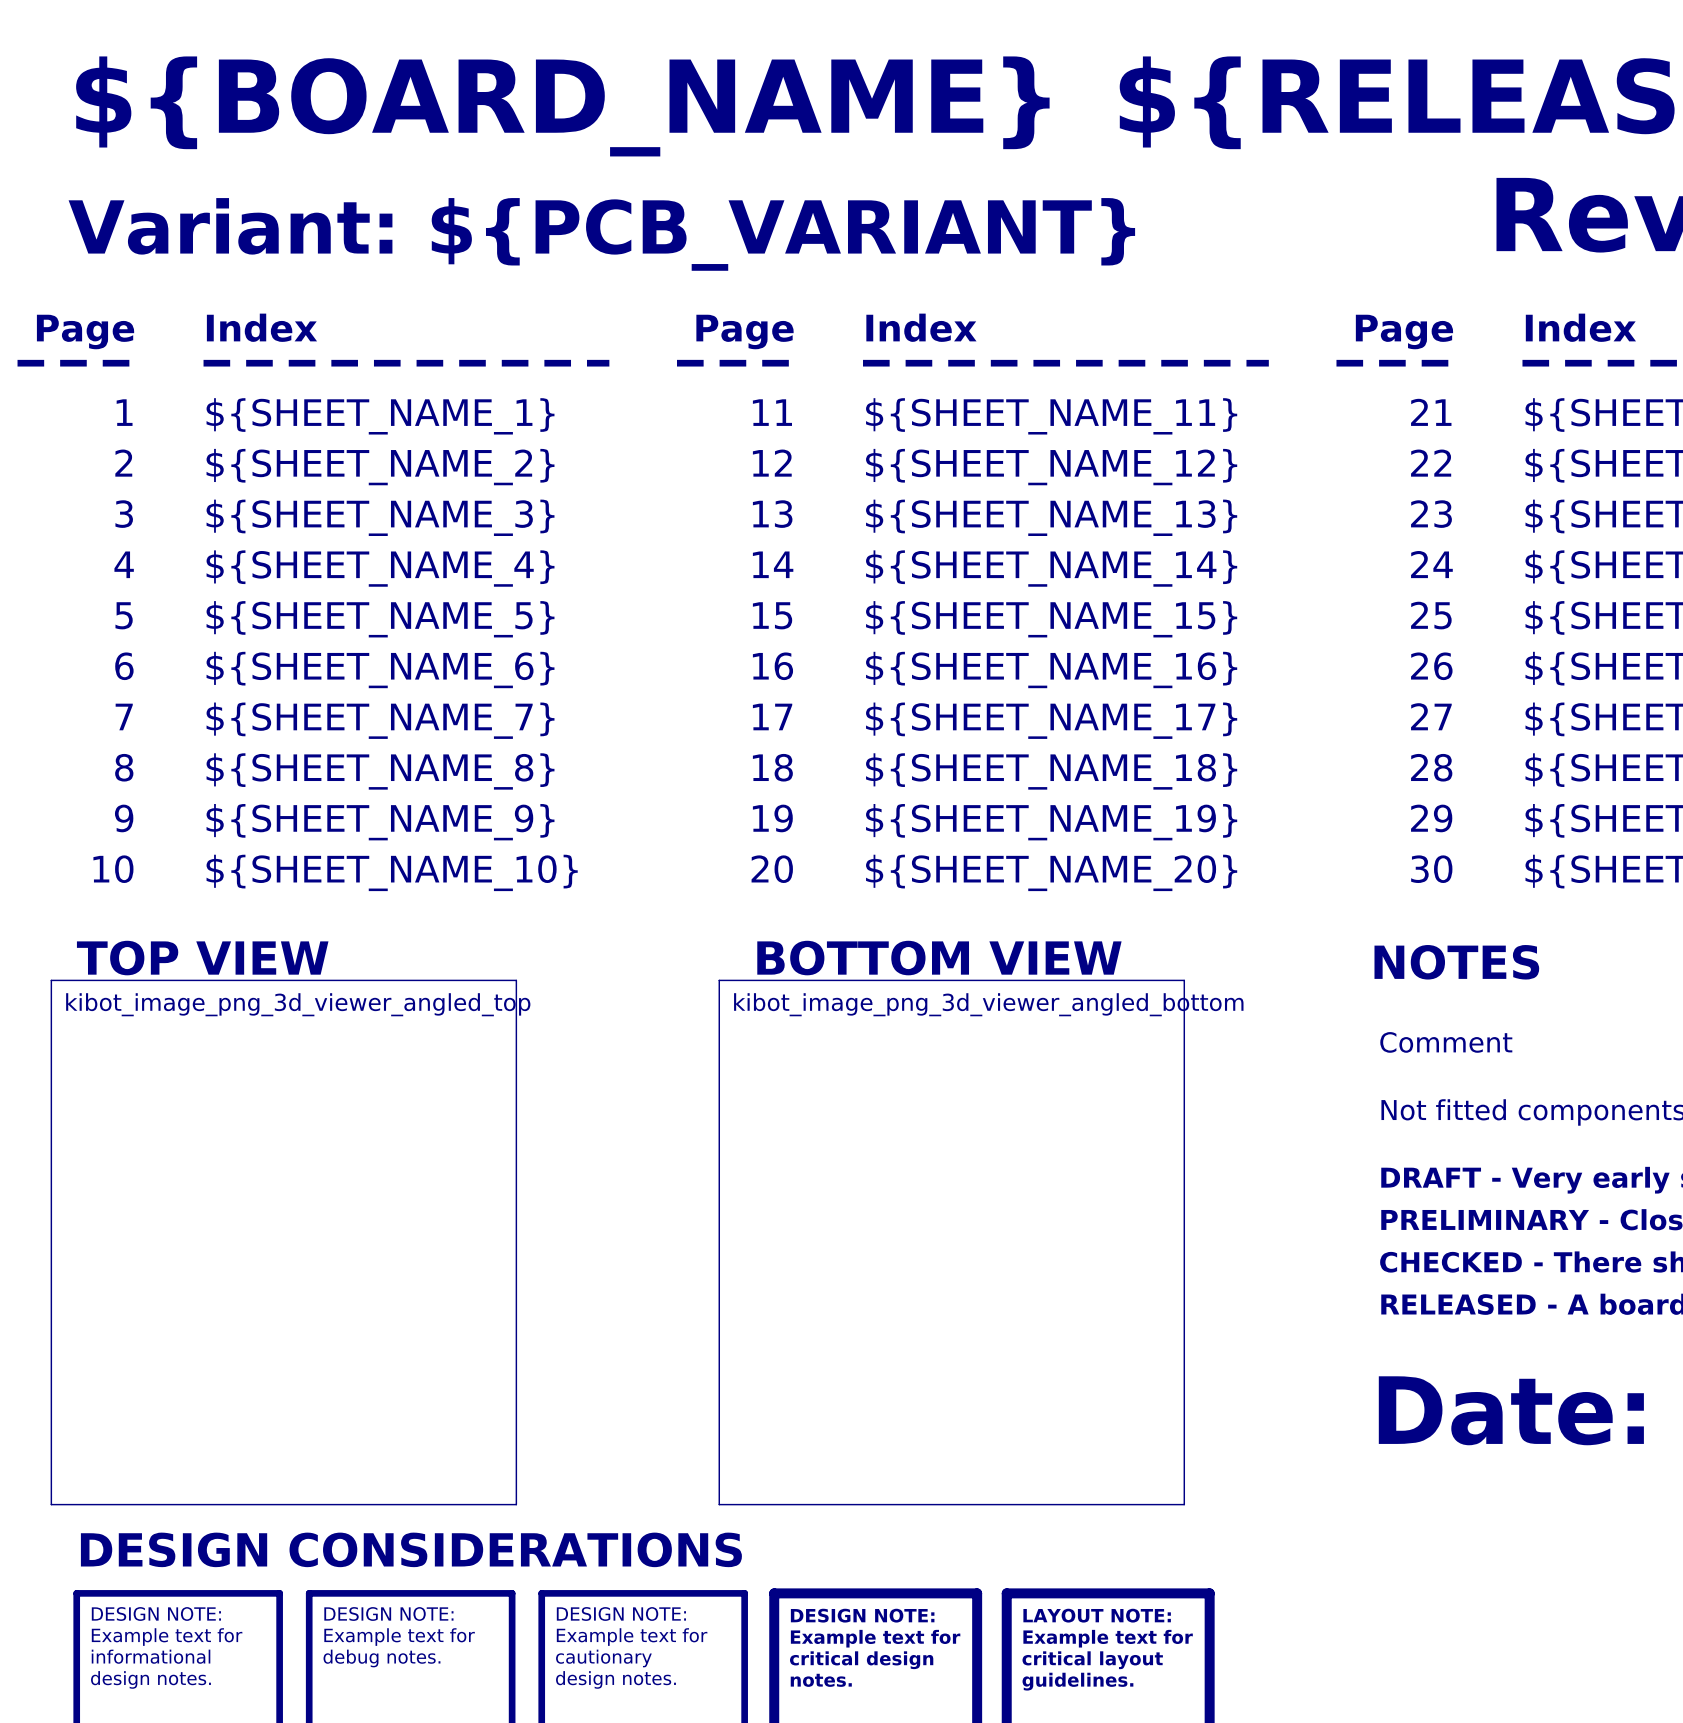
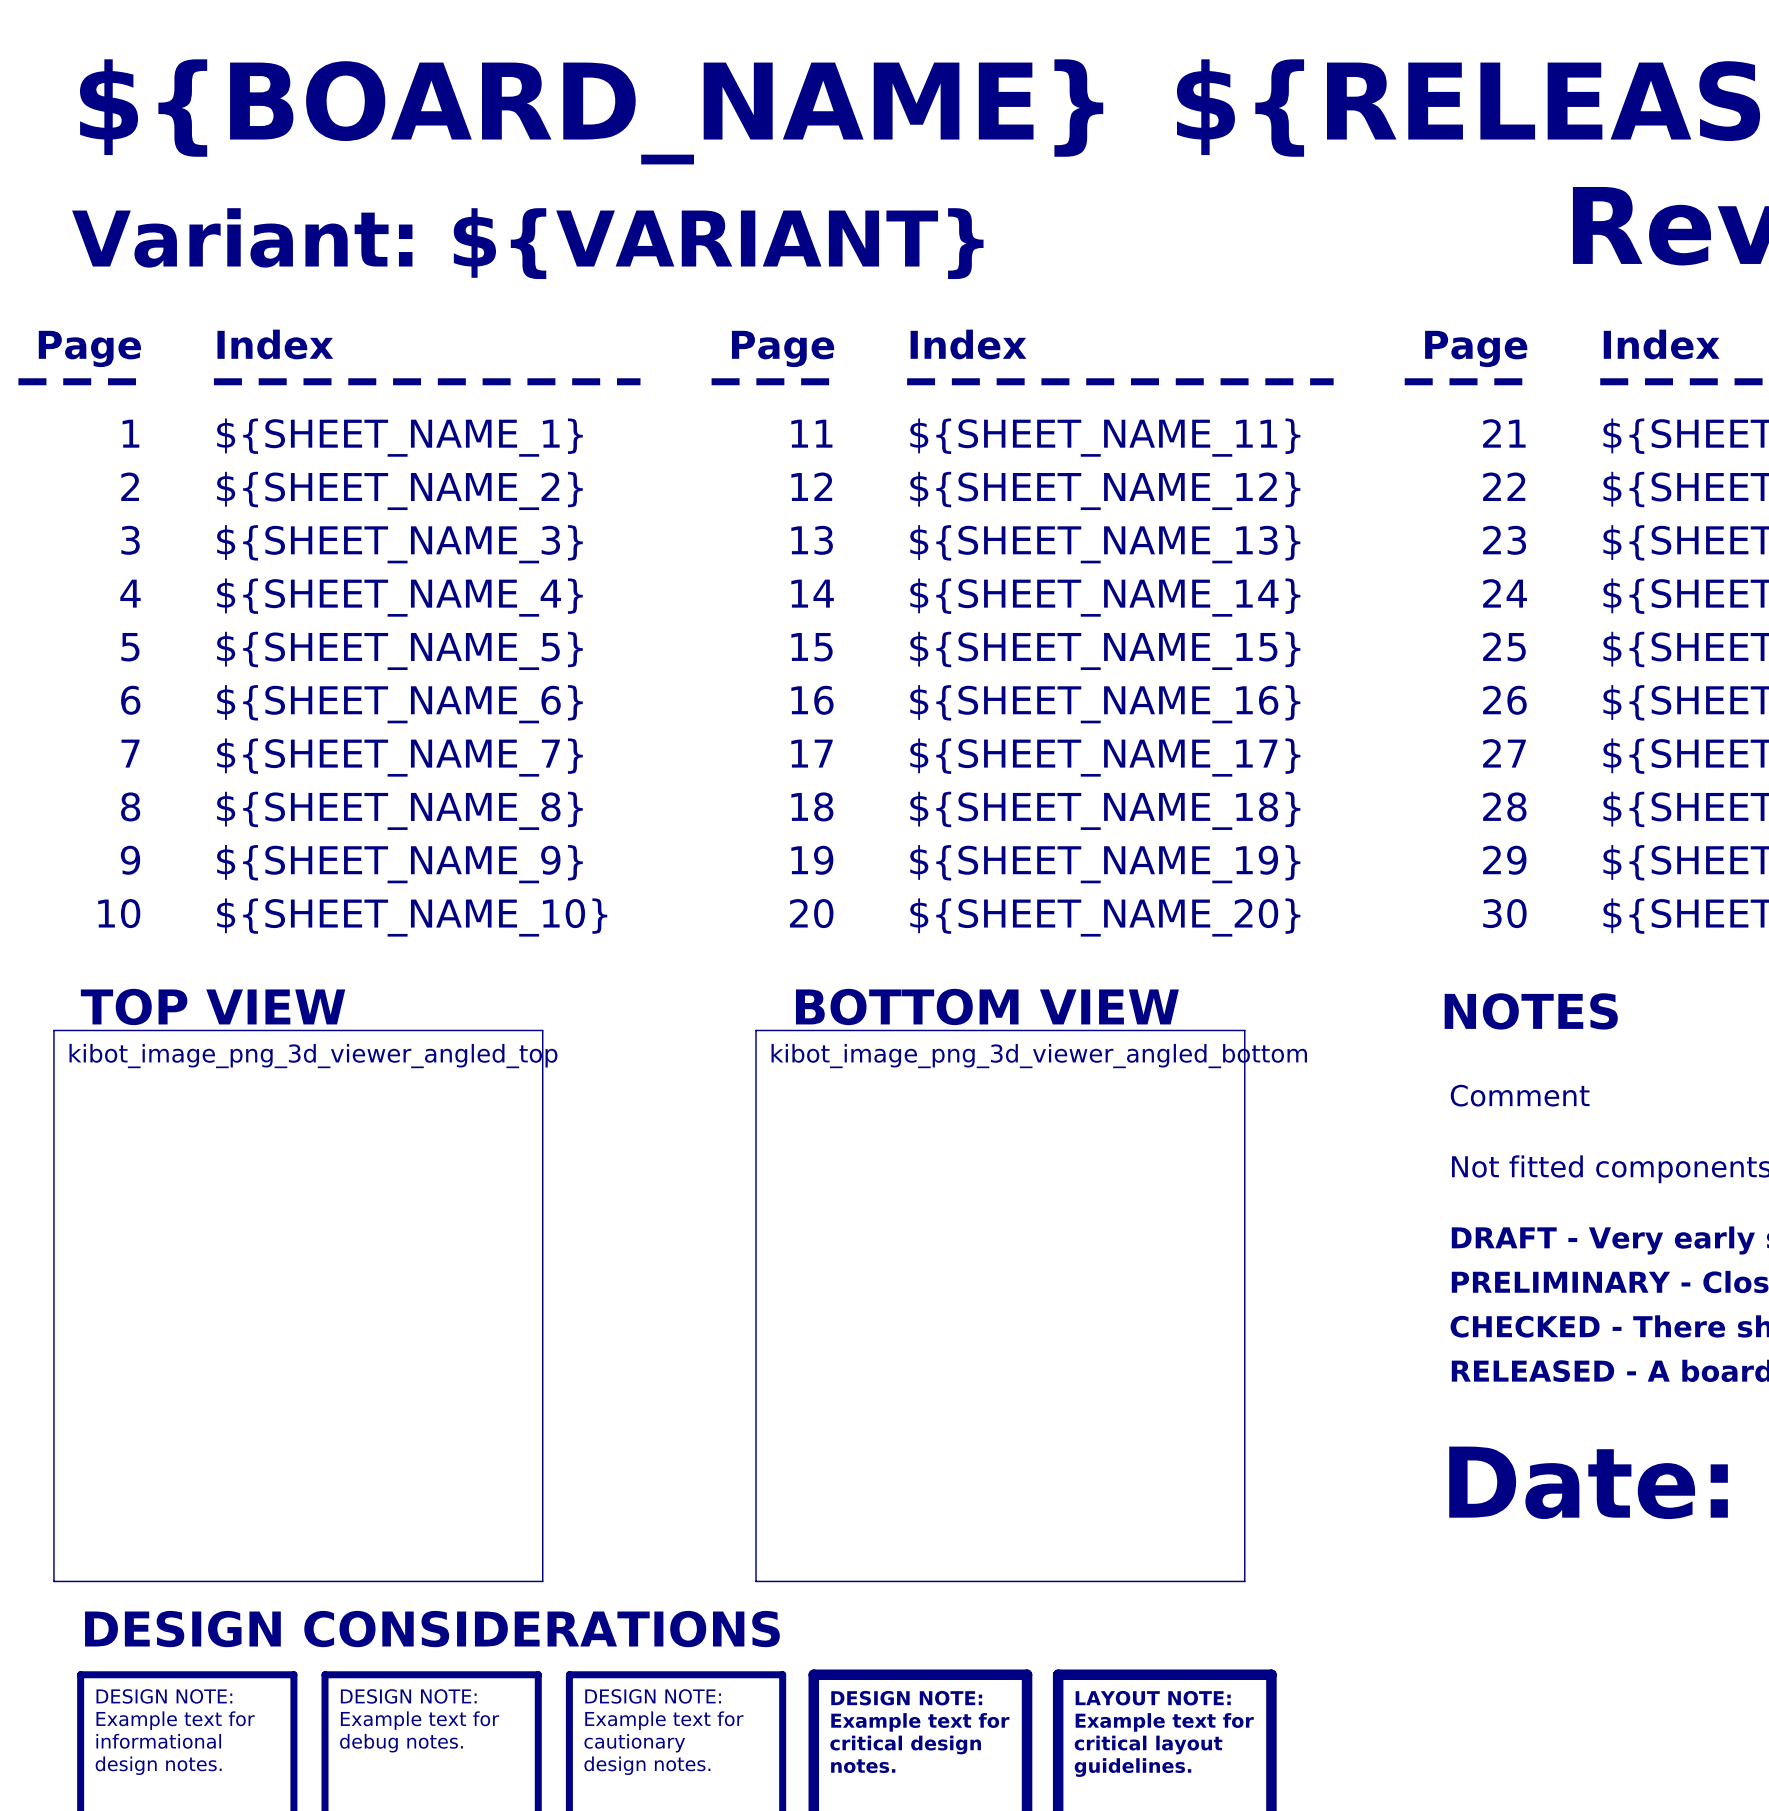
text: Variant: ${PCB_VARIANT} (601, 234) -> Variant: ${VARIANT} (527, 243)

